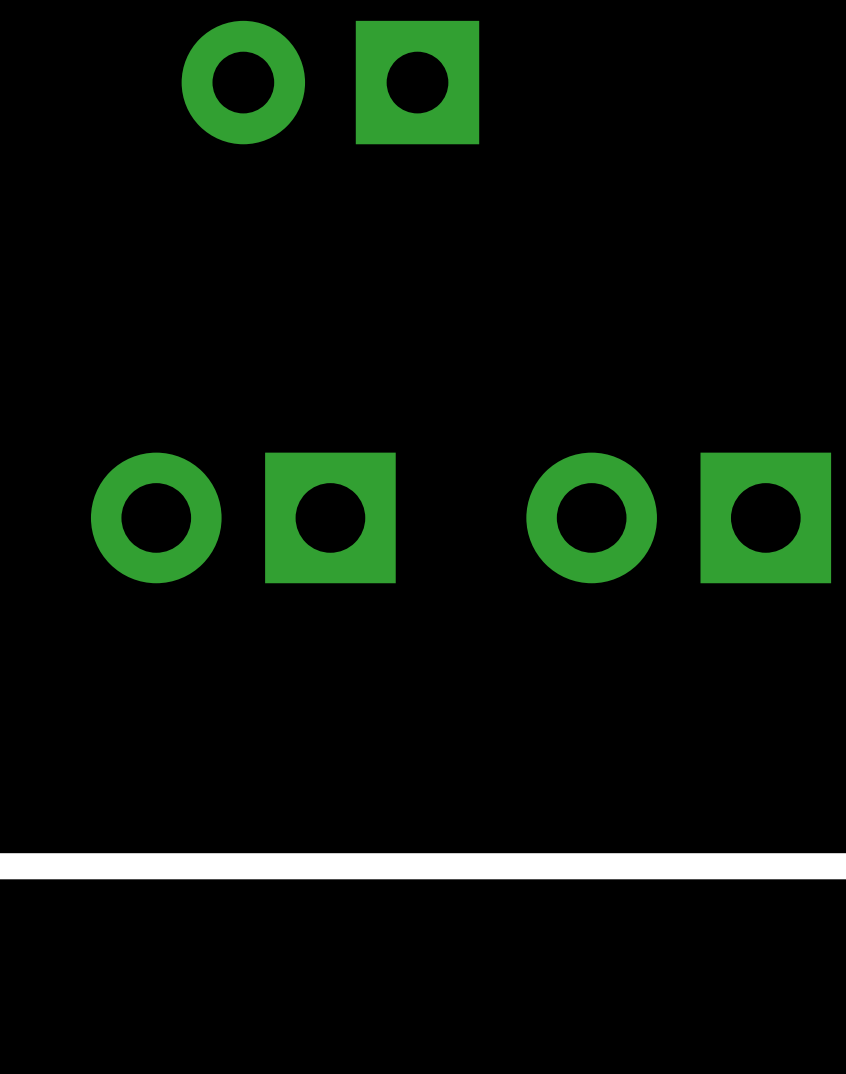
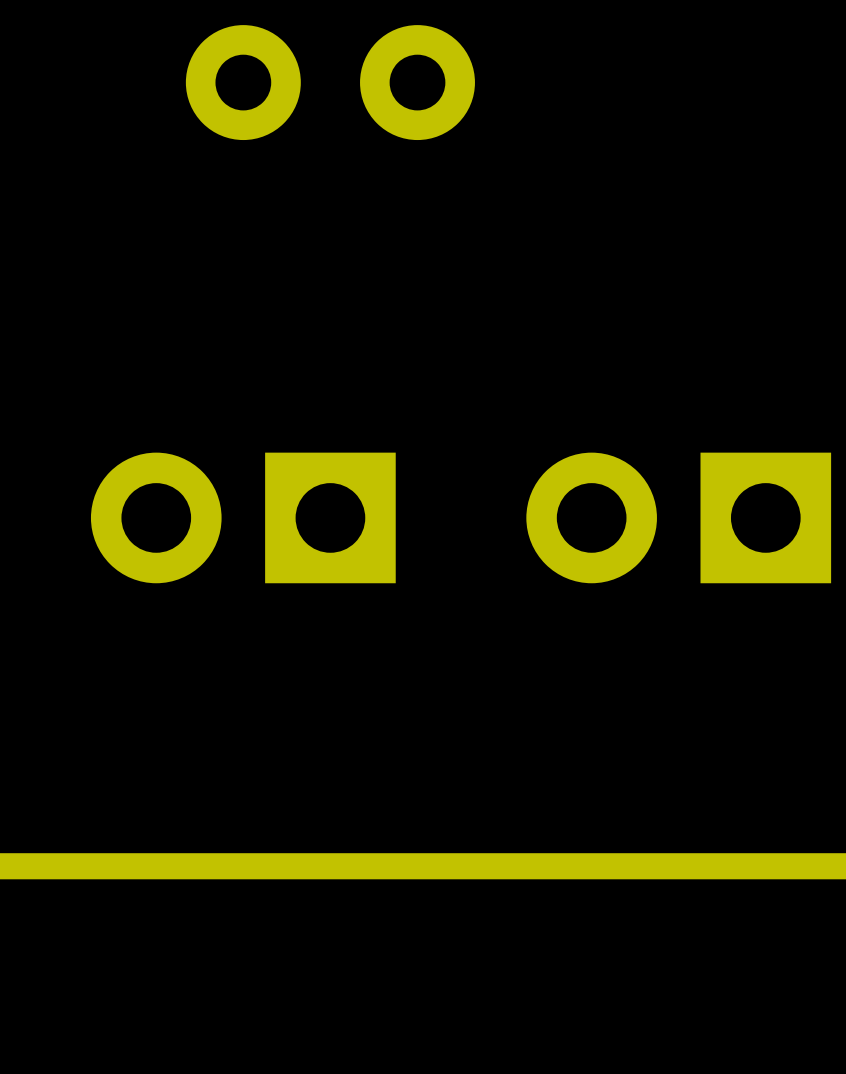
part footprint: [181, 20, 480, 145] -> [185, 25, 475, 141]

